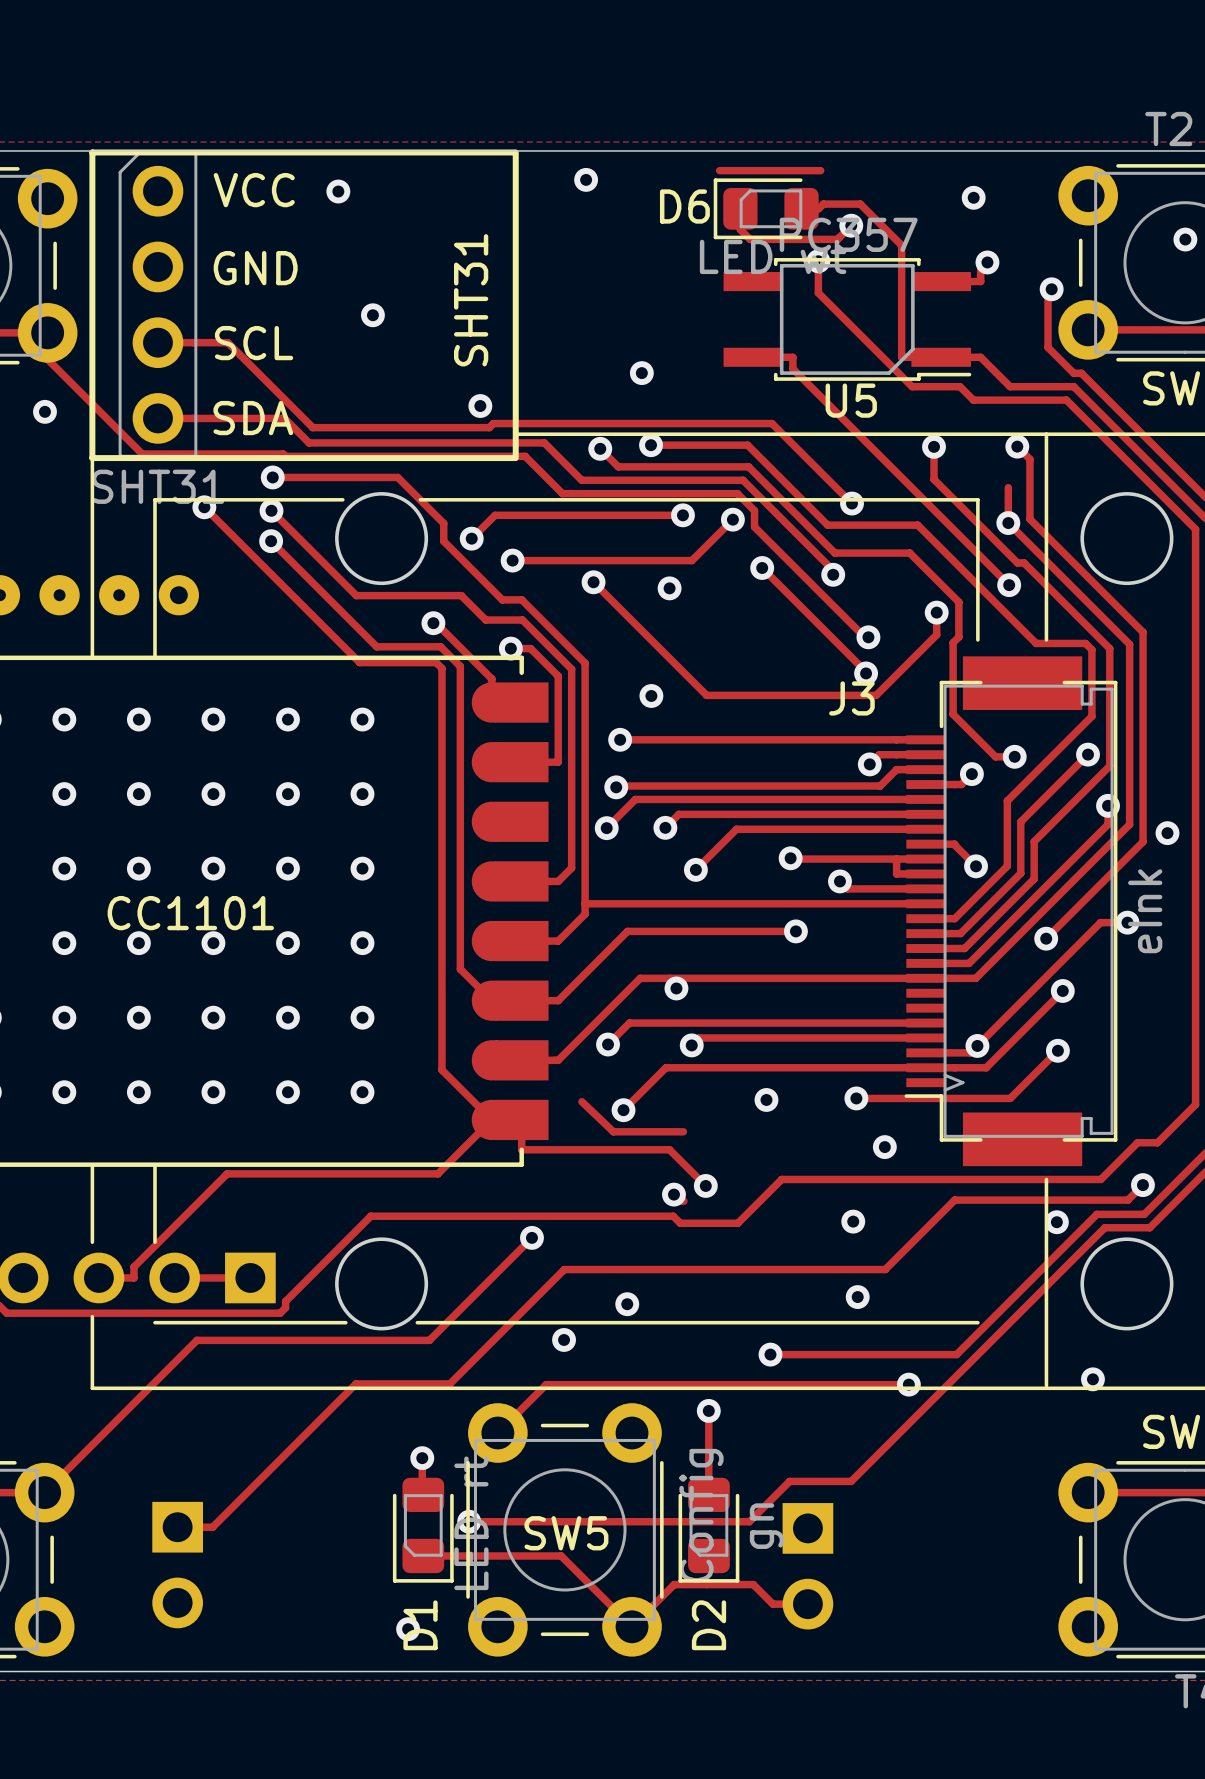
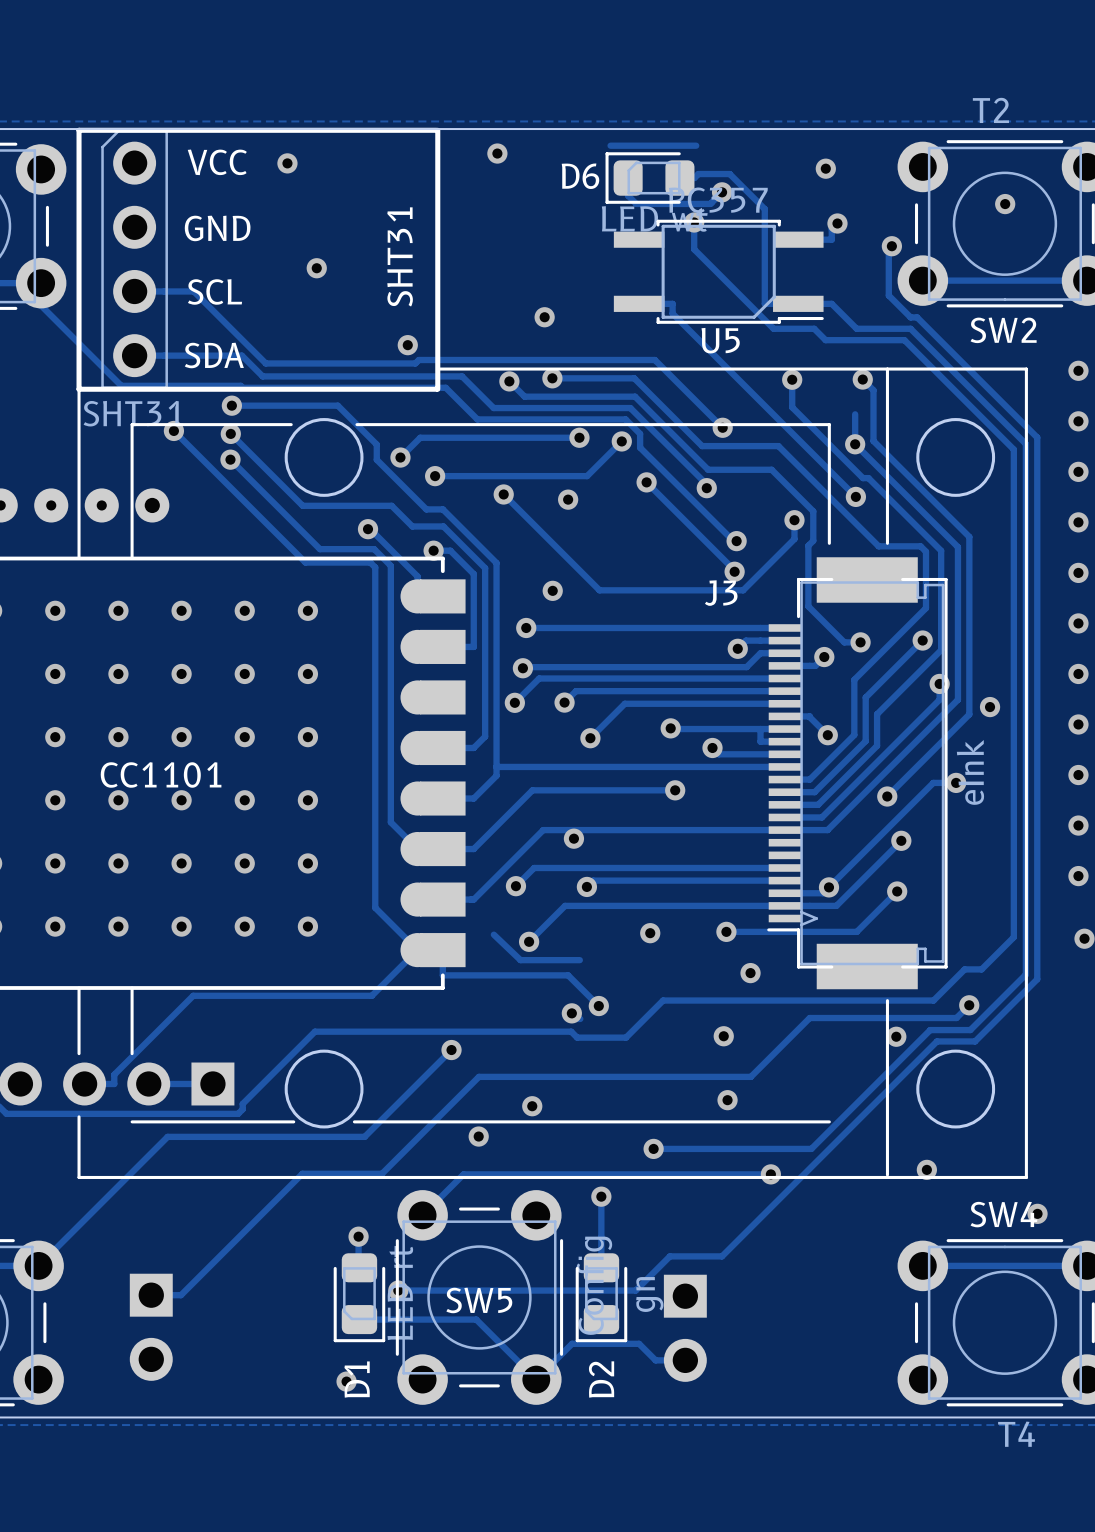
via: (44, 411) -> none

